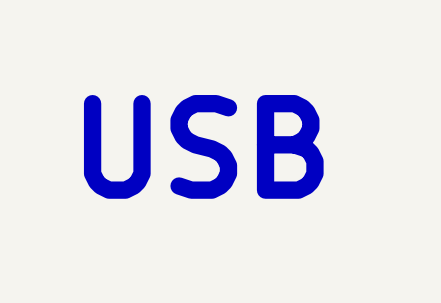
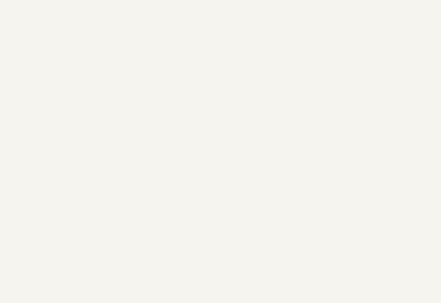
text: USB (203, 146) -> none

